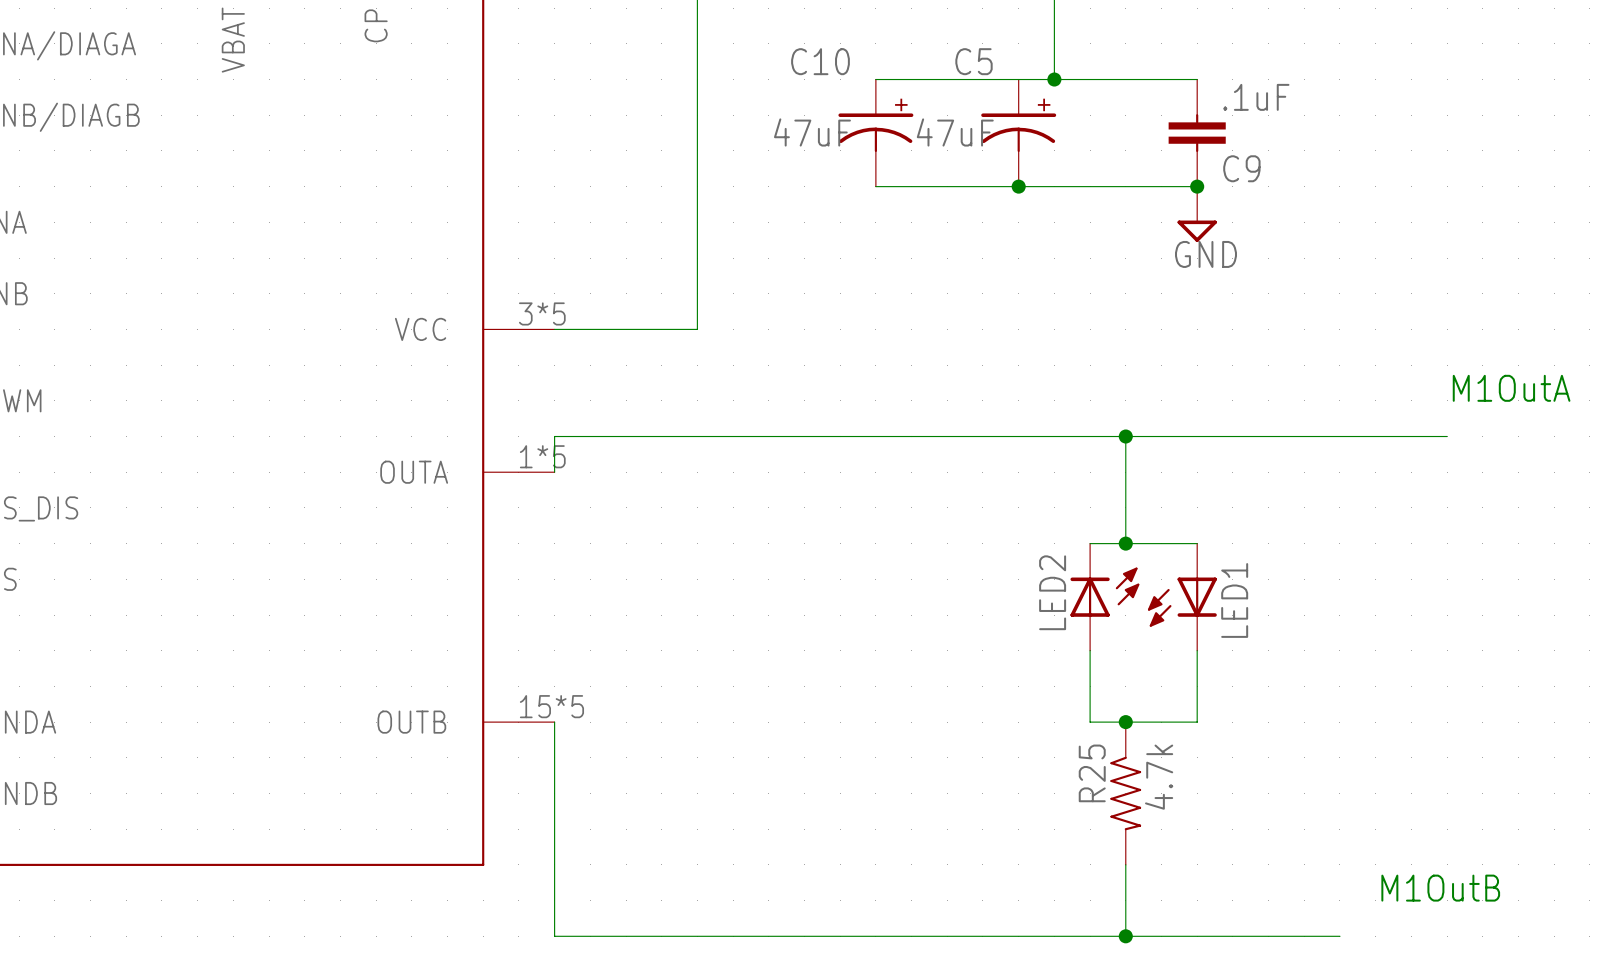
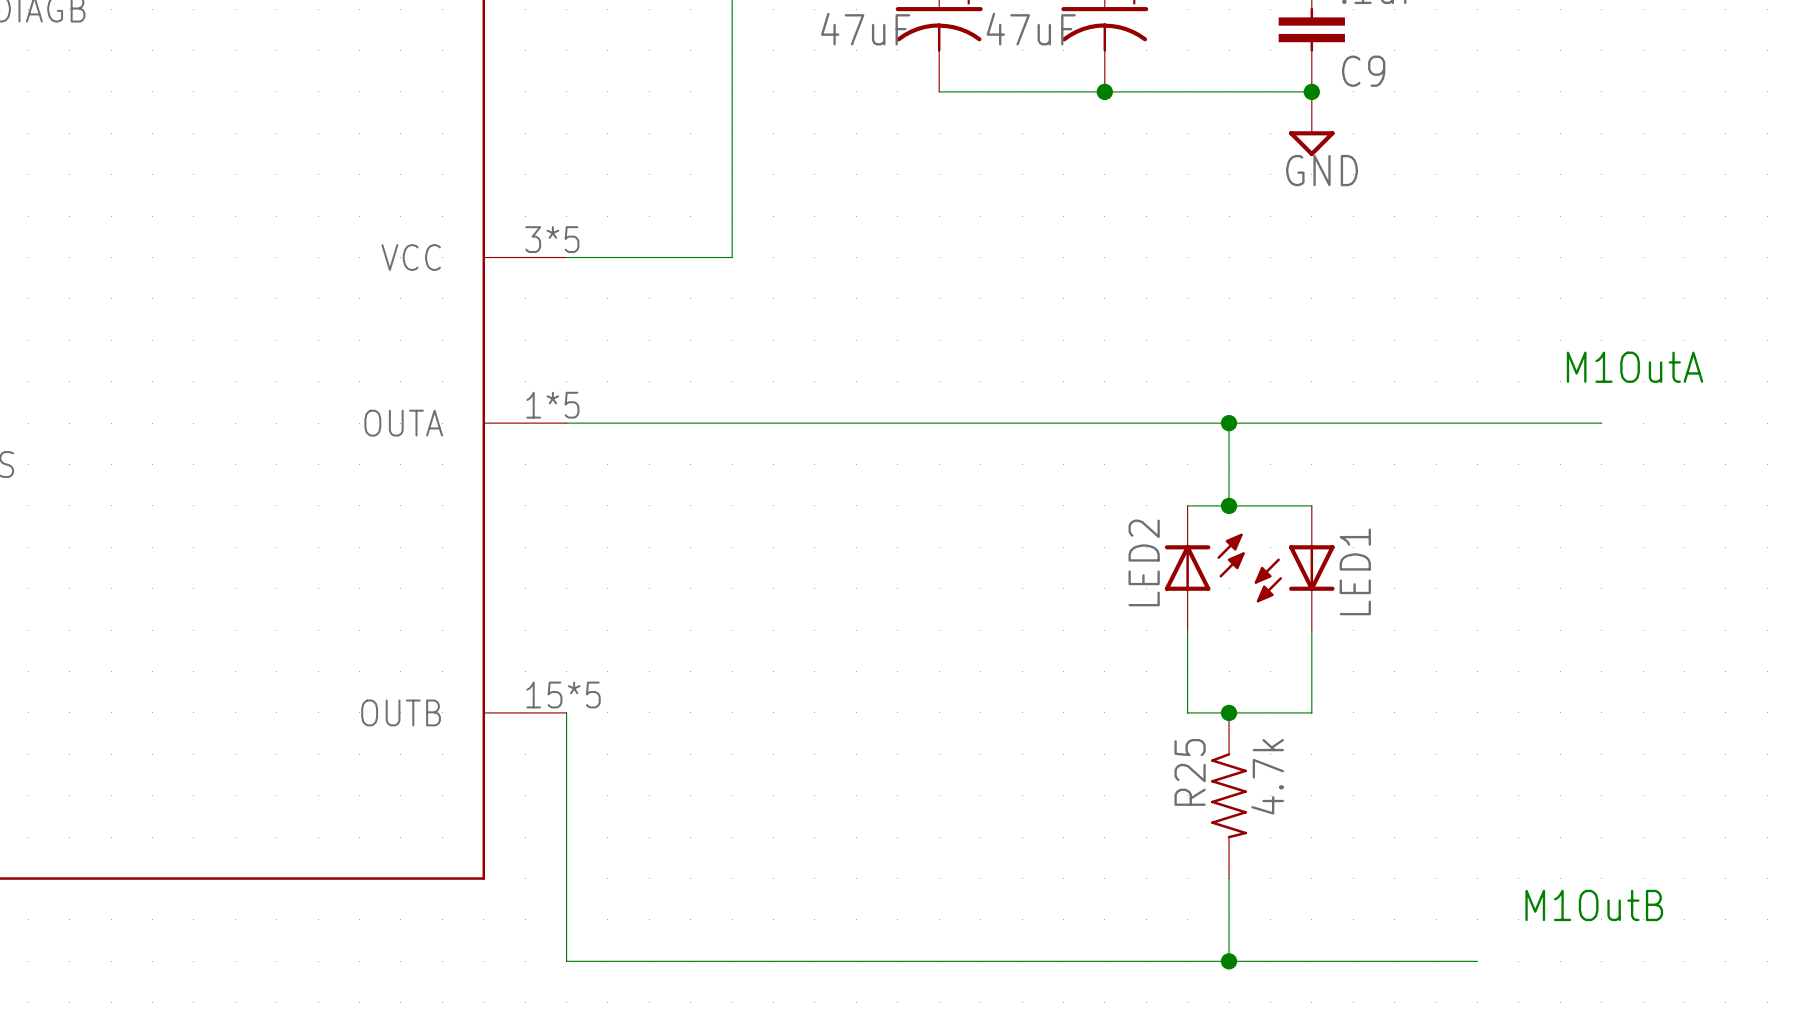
text position: M1OutA (1511, 388) -> M1OutA (1635, 367)
wire: (1125, 436) (1125, 472) -> none
junction position: (1125, 436) -> (1229, 423)
wire: (1447, 436) (554, 436) (554, 472) -> (1601, 423) (566, 423)

